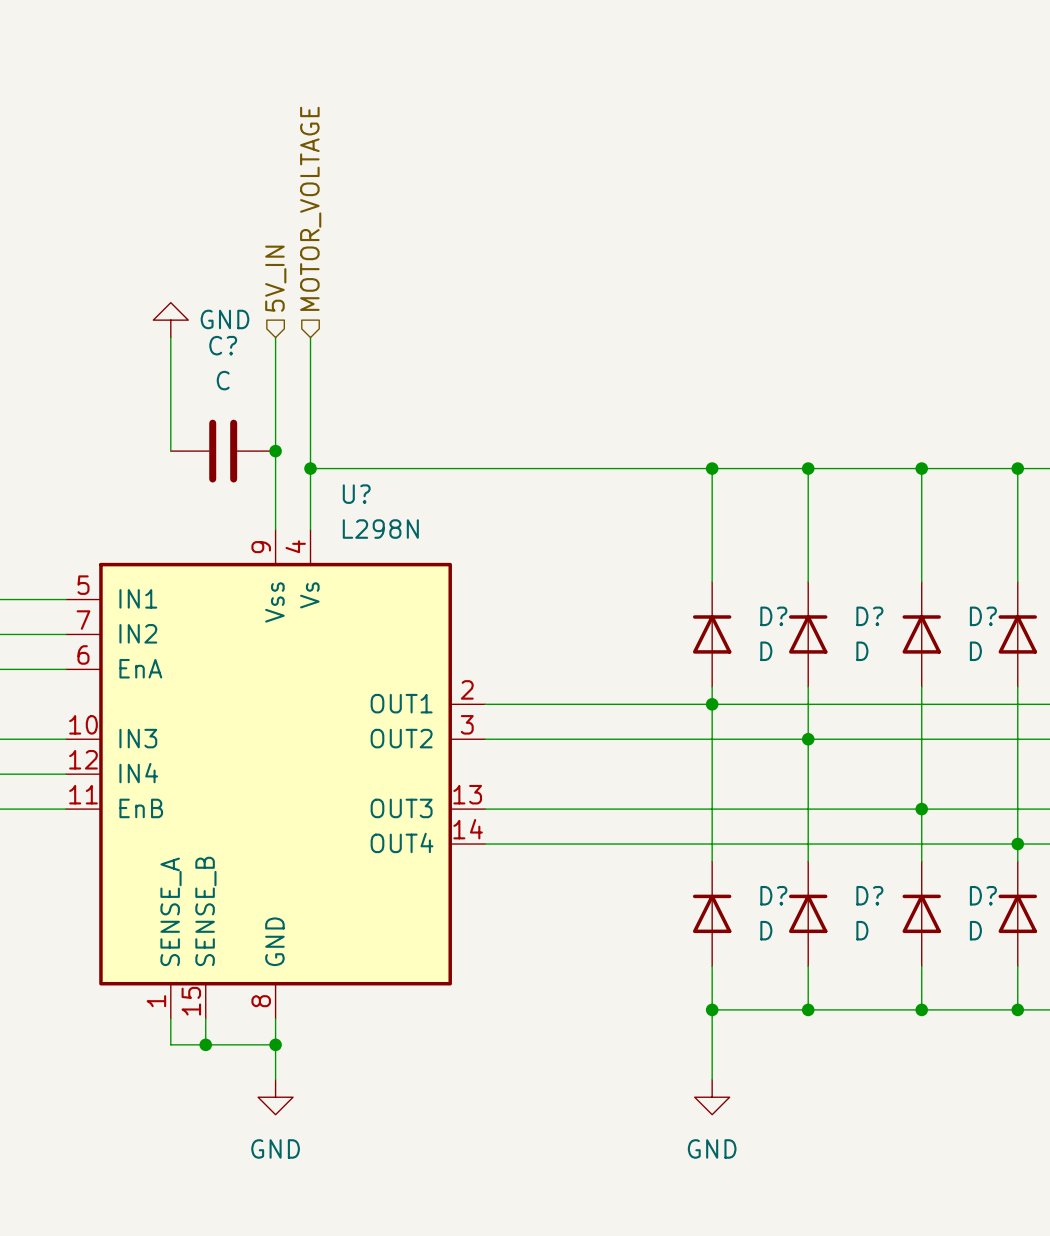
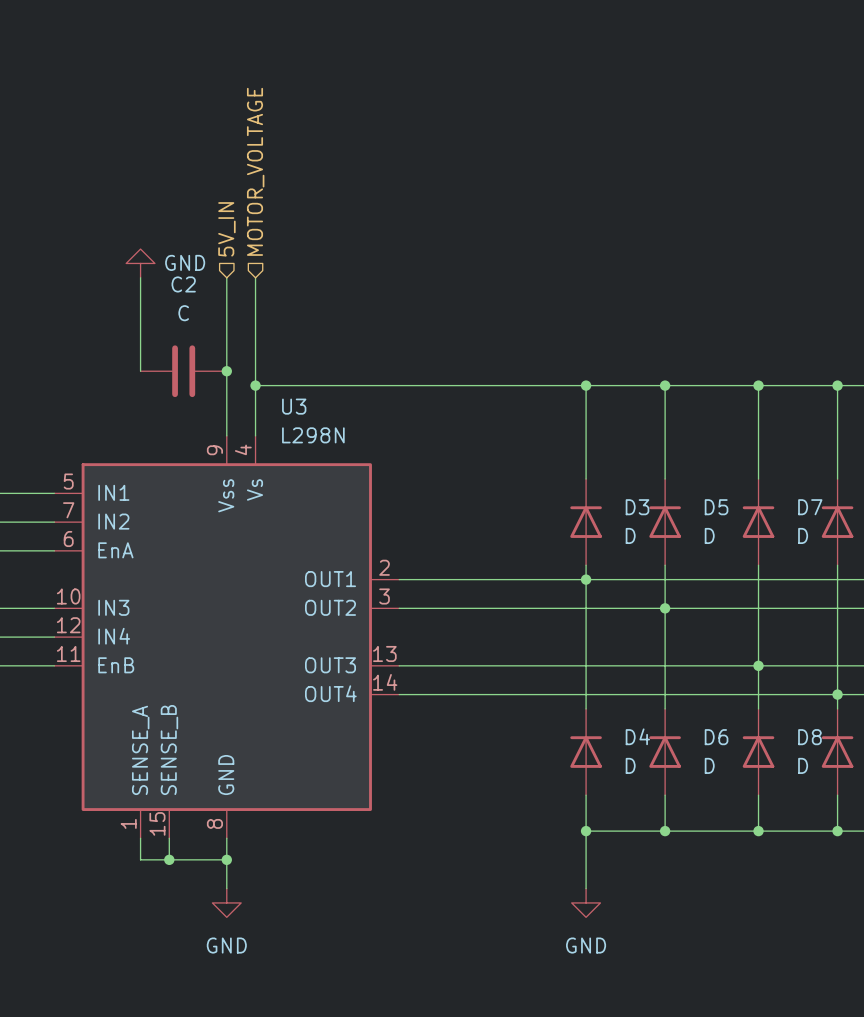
C? name: C? (223, 345) -> C2 (183, 284)
U? name: U? (356, 494) -> U3 (294, 406)
D? name: D? (773, 616) -> D3 (637, 507)
D? name: D? (869, 616) -> D5 (716, 507)
D? name: D? (983, 616) -> D7 (810, 507)
D? name: D? (773, 895) -> D4 (637, 736)
D? name: D? (869, 895) -> D6 (716, 737)
D? name: D? (983, 895) -> D8 (809, 737)

